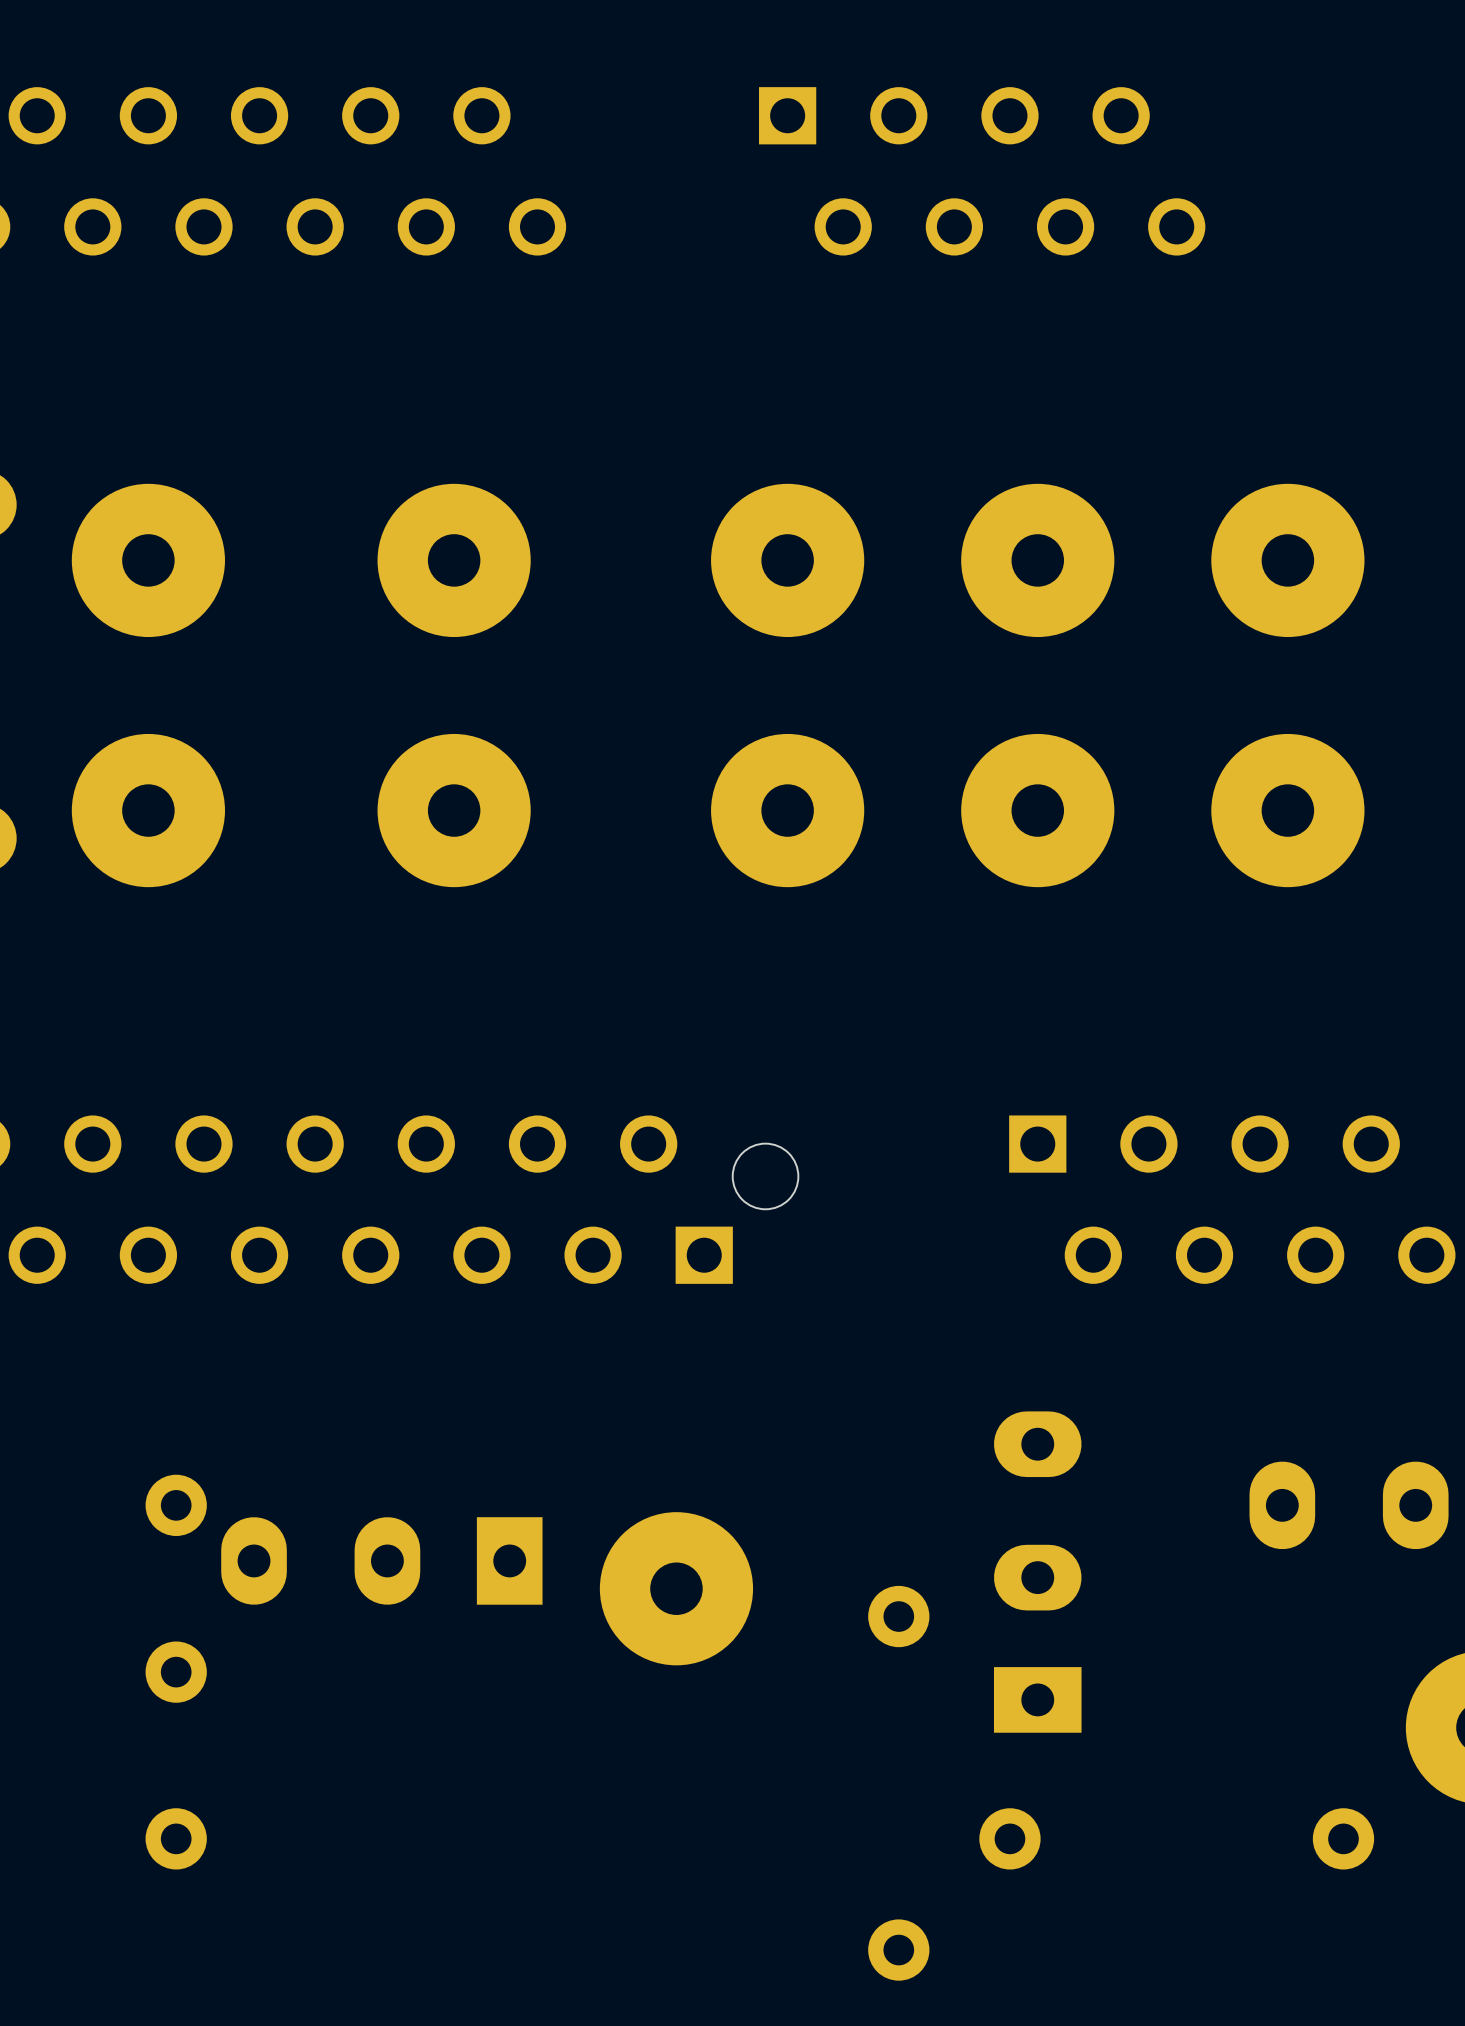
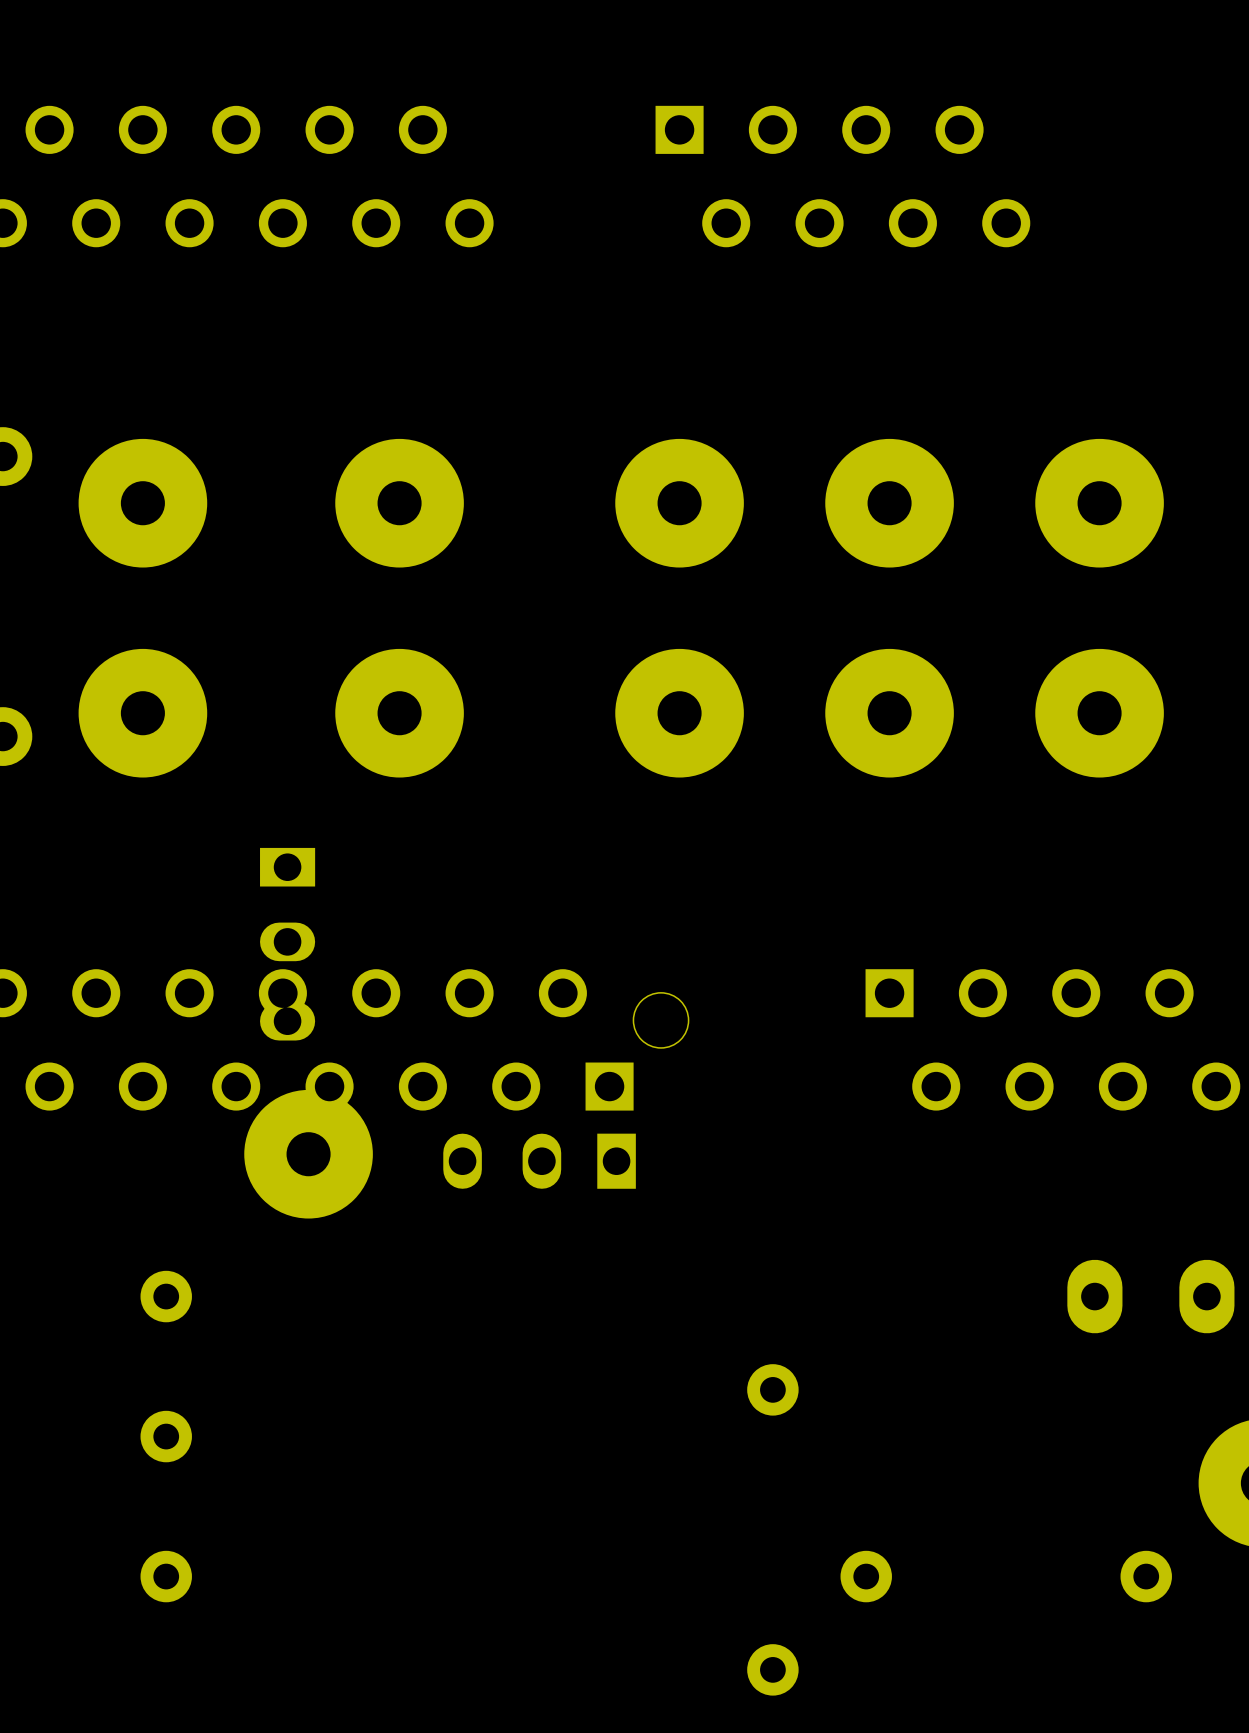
part: none -> (287, 944)
part: none -> (539, 1161)
part: (381, 1560) -> none
part: (1037, 1572) -> none
part position: (676, 1588) -> (308, 1154)

